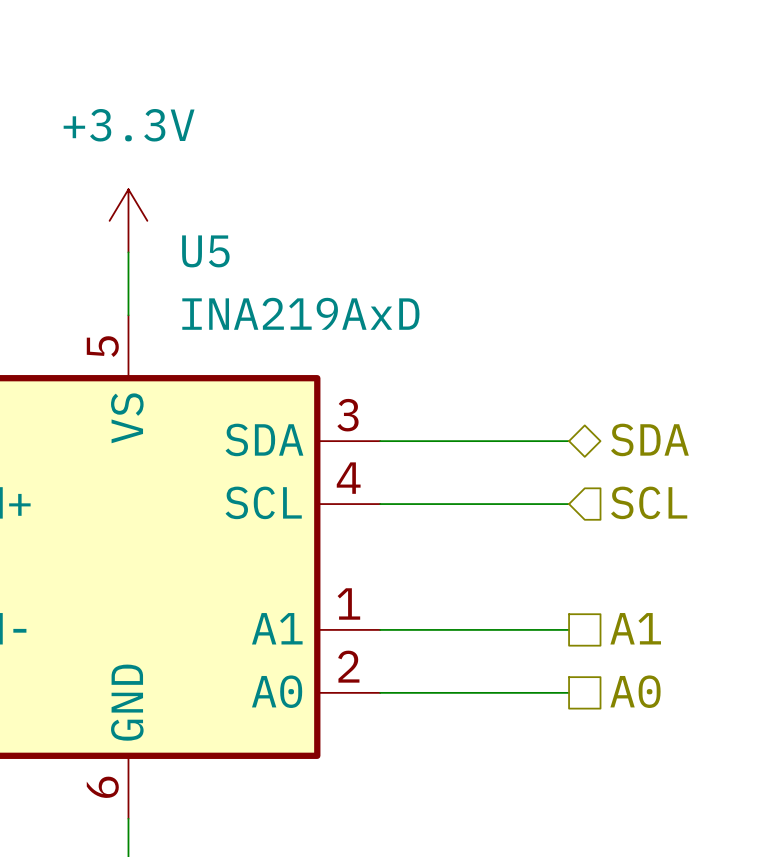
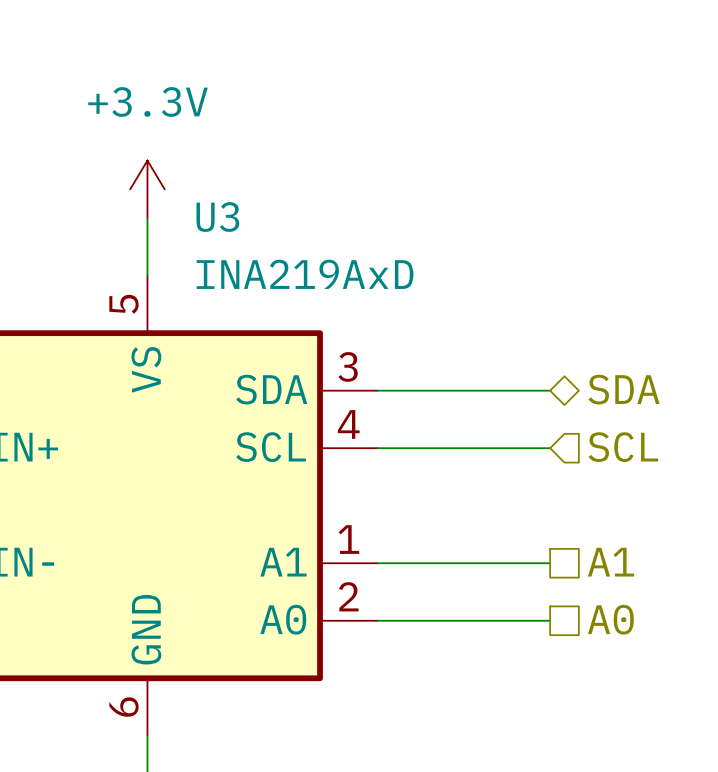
U5 name: U5 (205, 251) -> U3 (217, 217)

